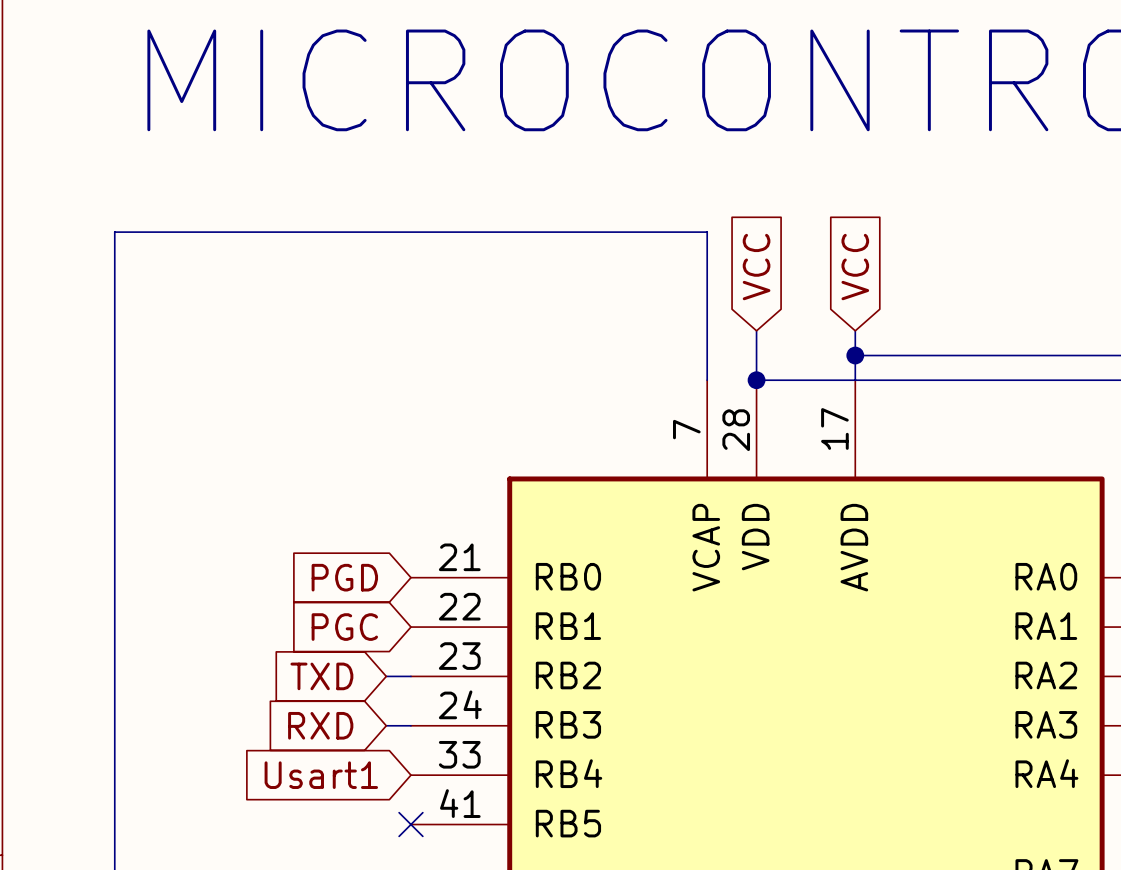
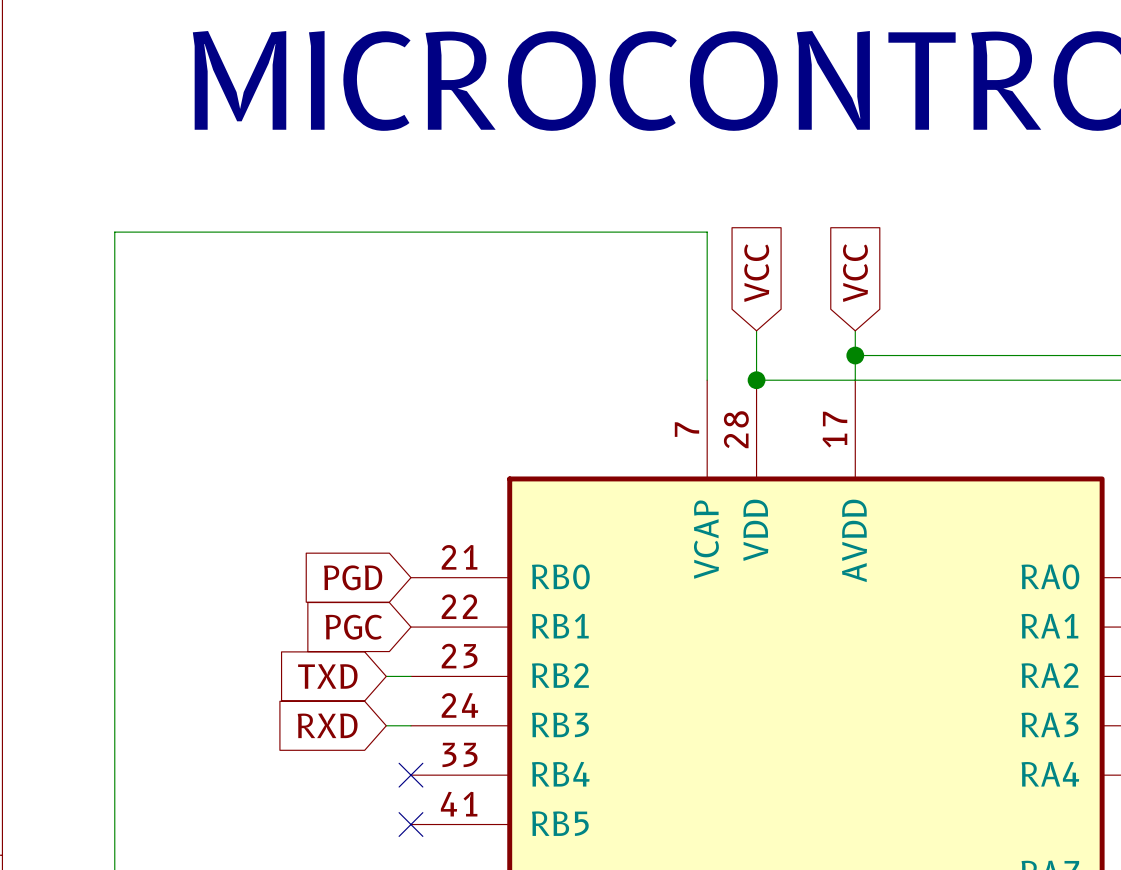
global label: Usart1 (321, 775) -> none
no-connect mark: none -> (410, 775)

